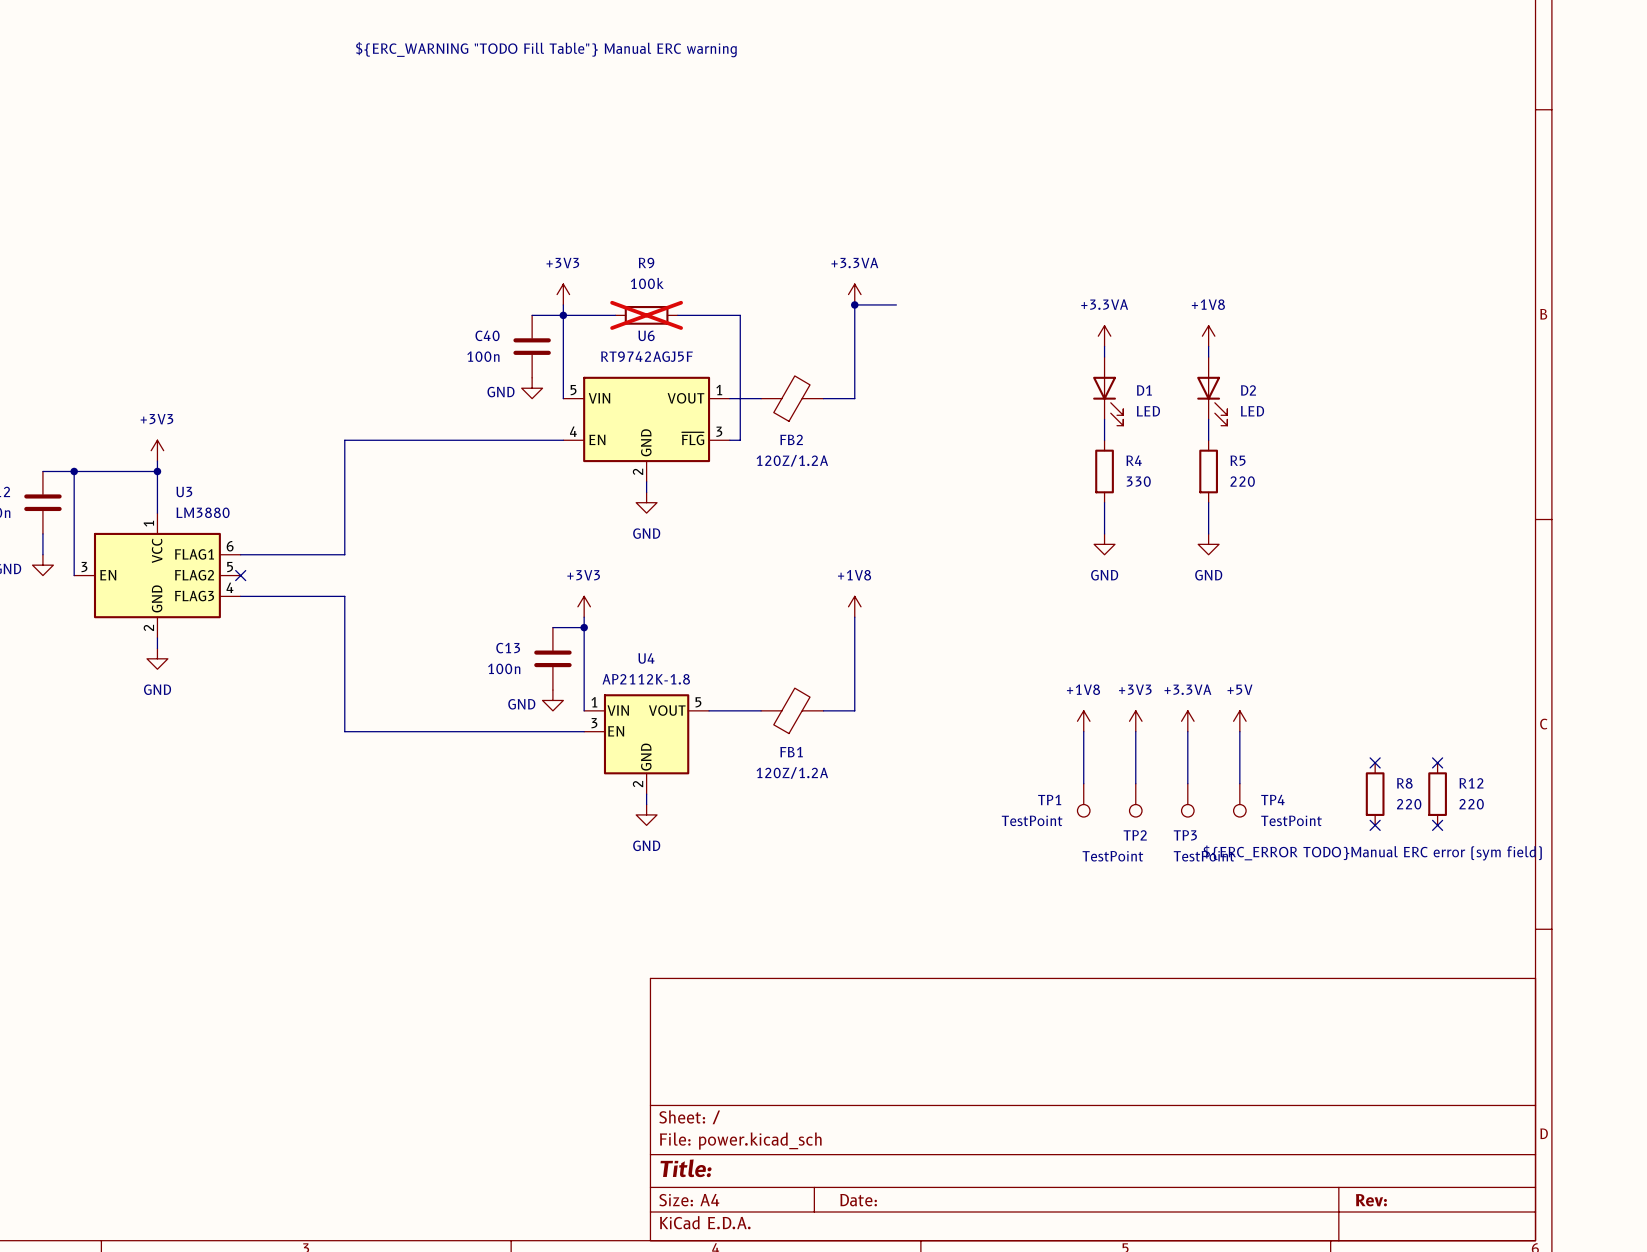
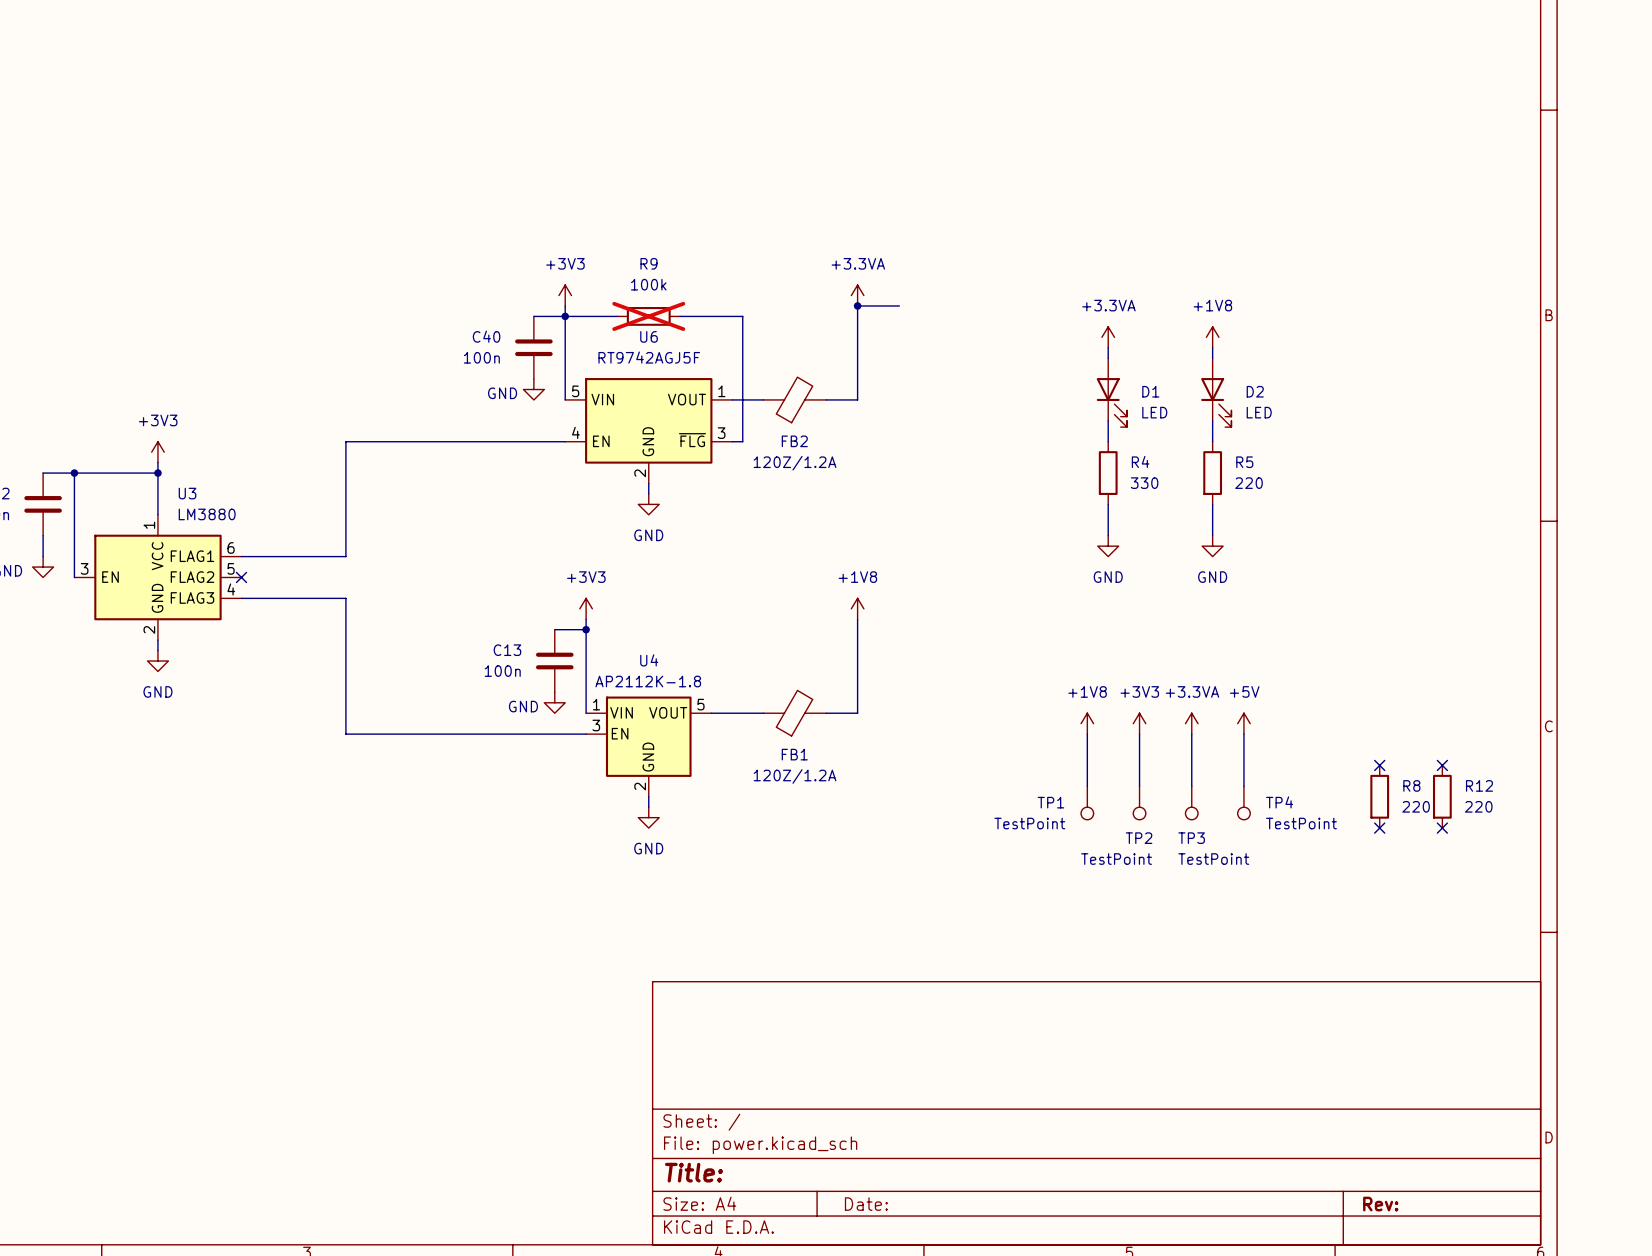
text: ${ERC_WARNING "TODO Fill Table"} Manual ERC warning (546, 49) -> none
R8 text: ${ERC_ERROR TODO}Manual ERC error (sym field) (1372, 852) -> none

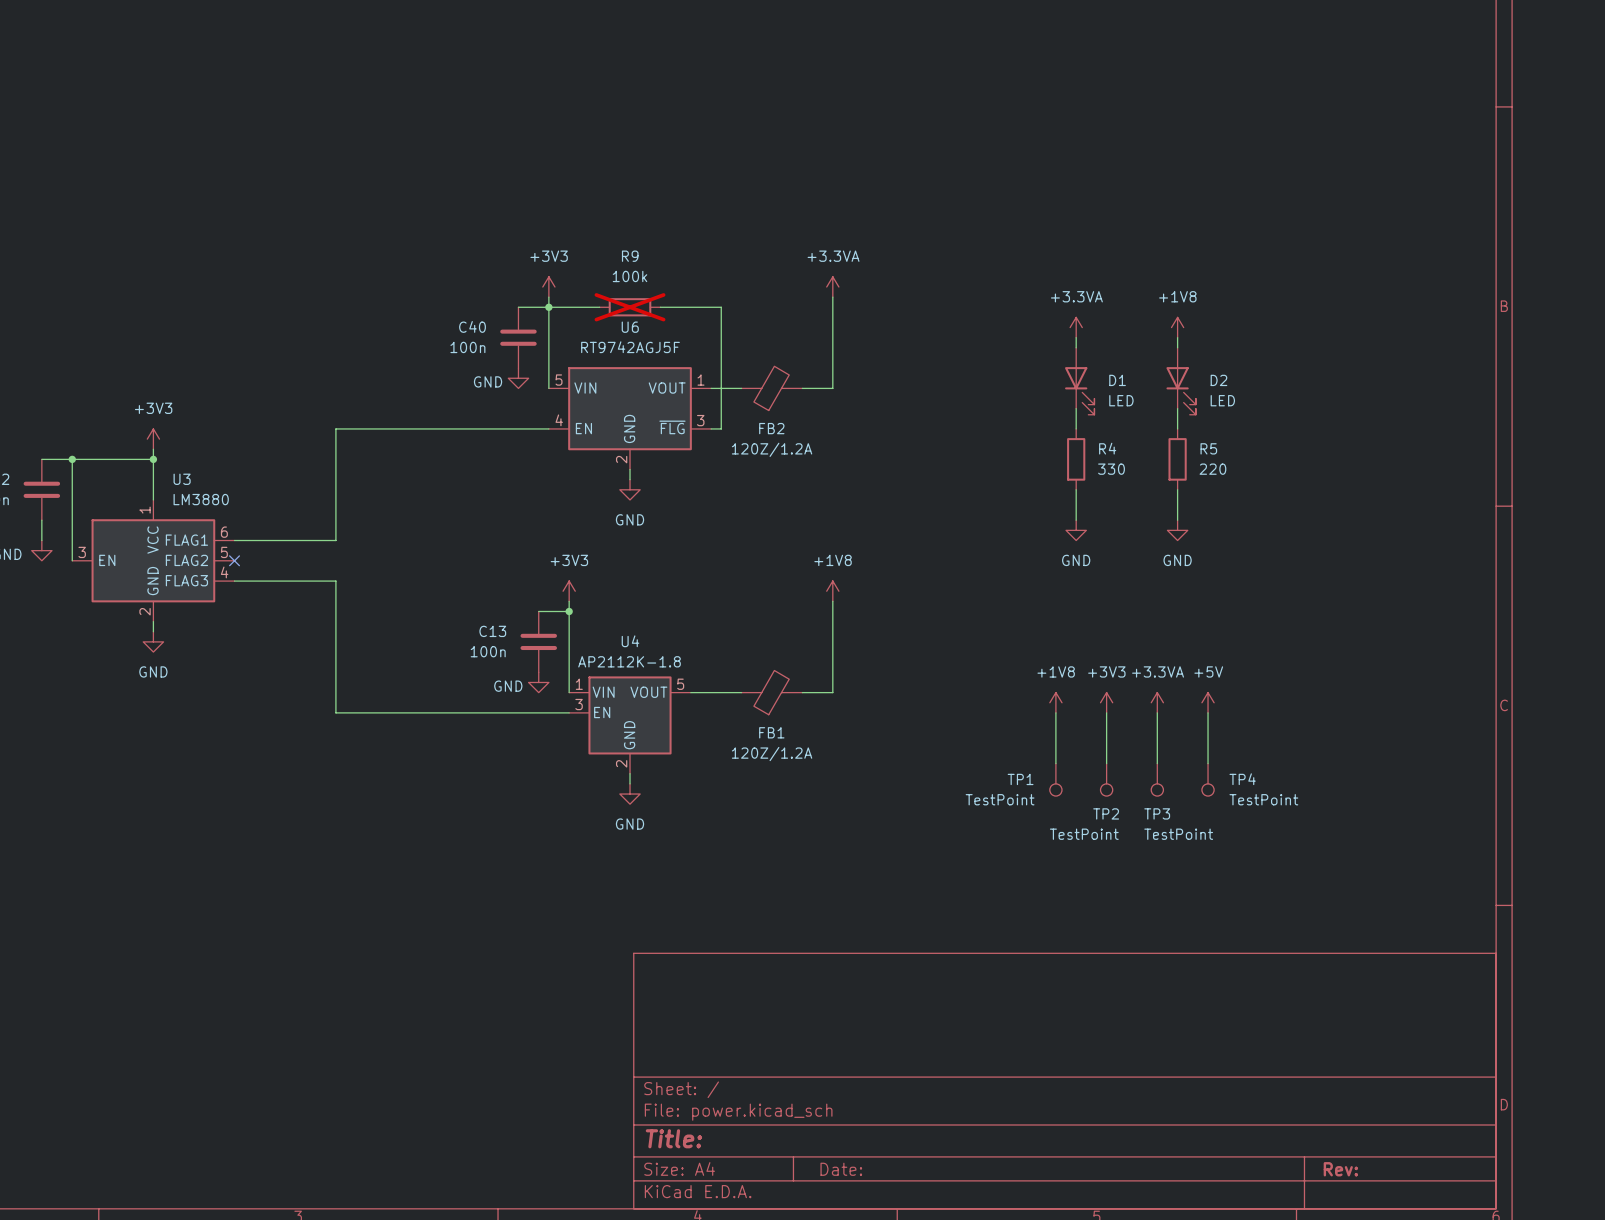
wire: (857, 305) (899, 305) -> none
junction: (857, 305) -> none
no-connect mark: (1379, 765) -> none
no-connect mark: (1442, 765) -> none
R8: 220 (1379, 796) -> none
R12: 220 (1442, 796) -> none
no-connect mark: (1379, 828) -> none
no-connect mark: (1442, 828) -> none

